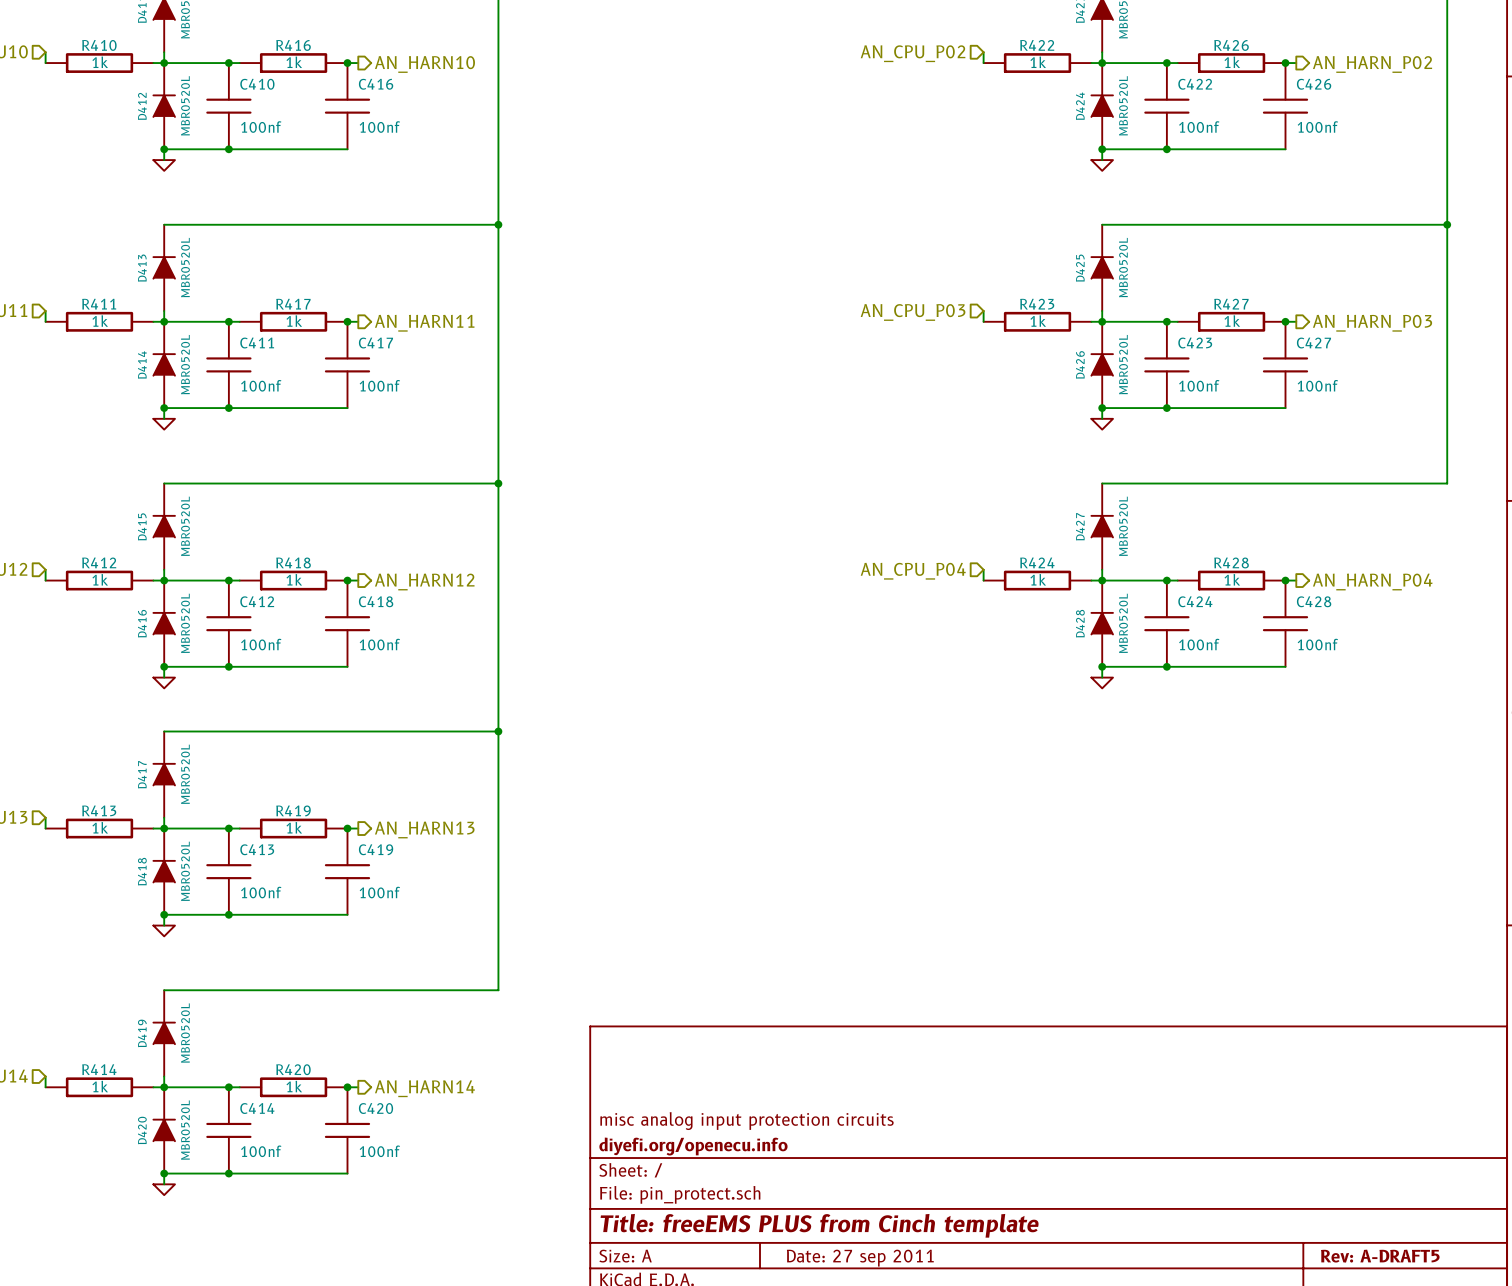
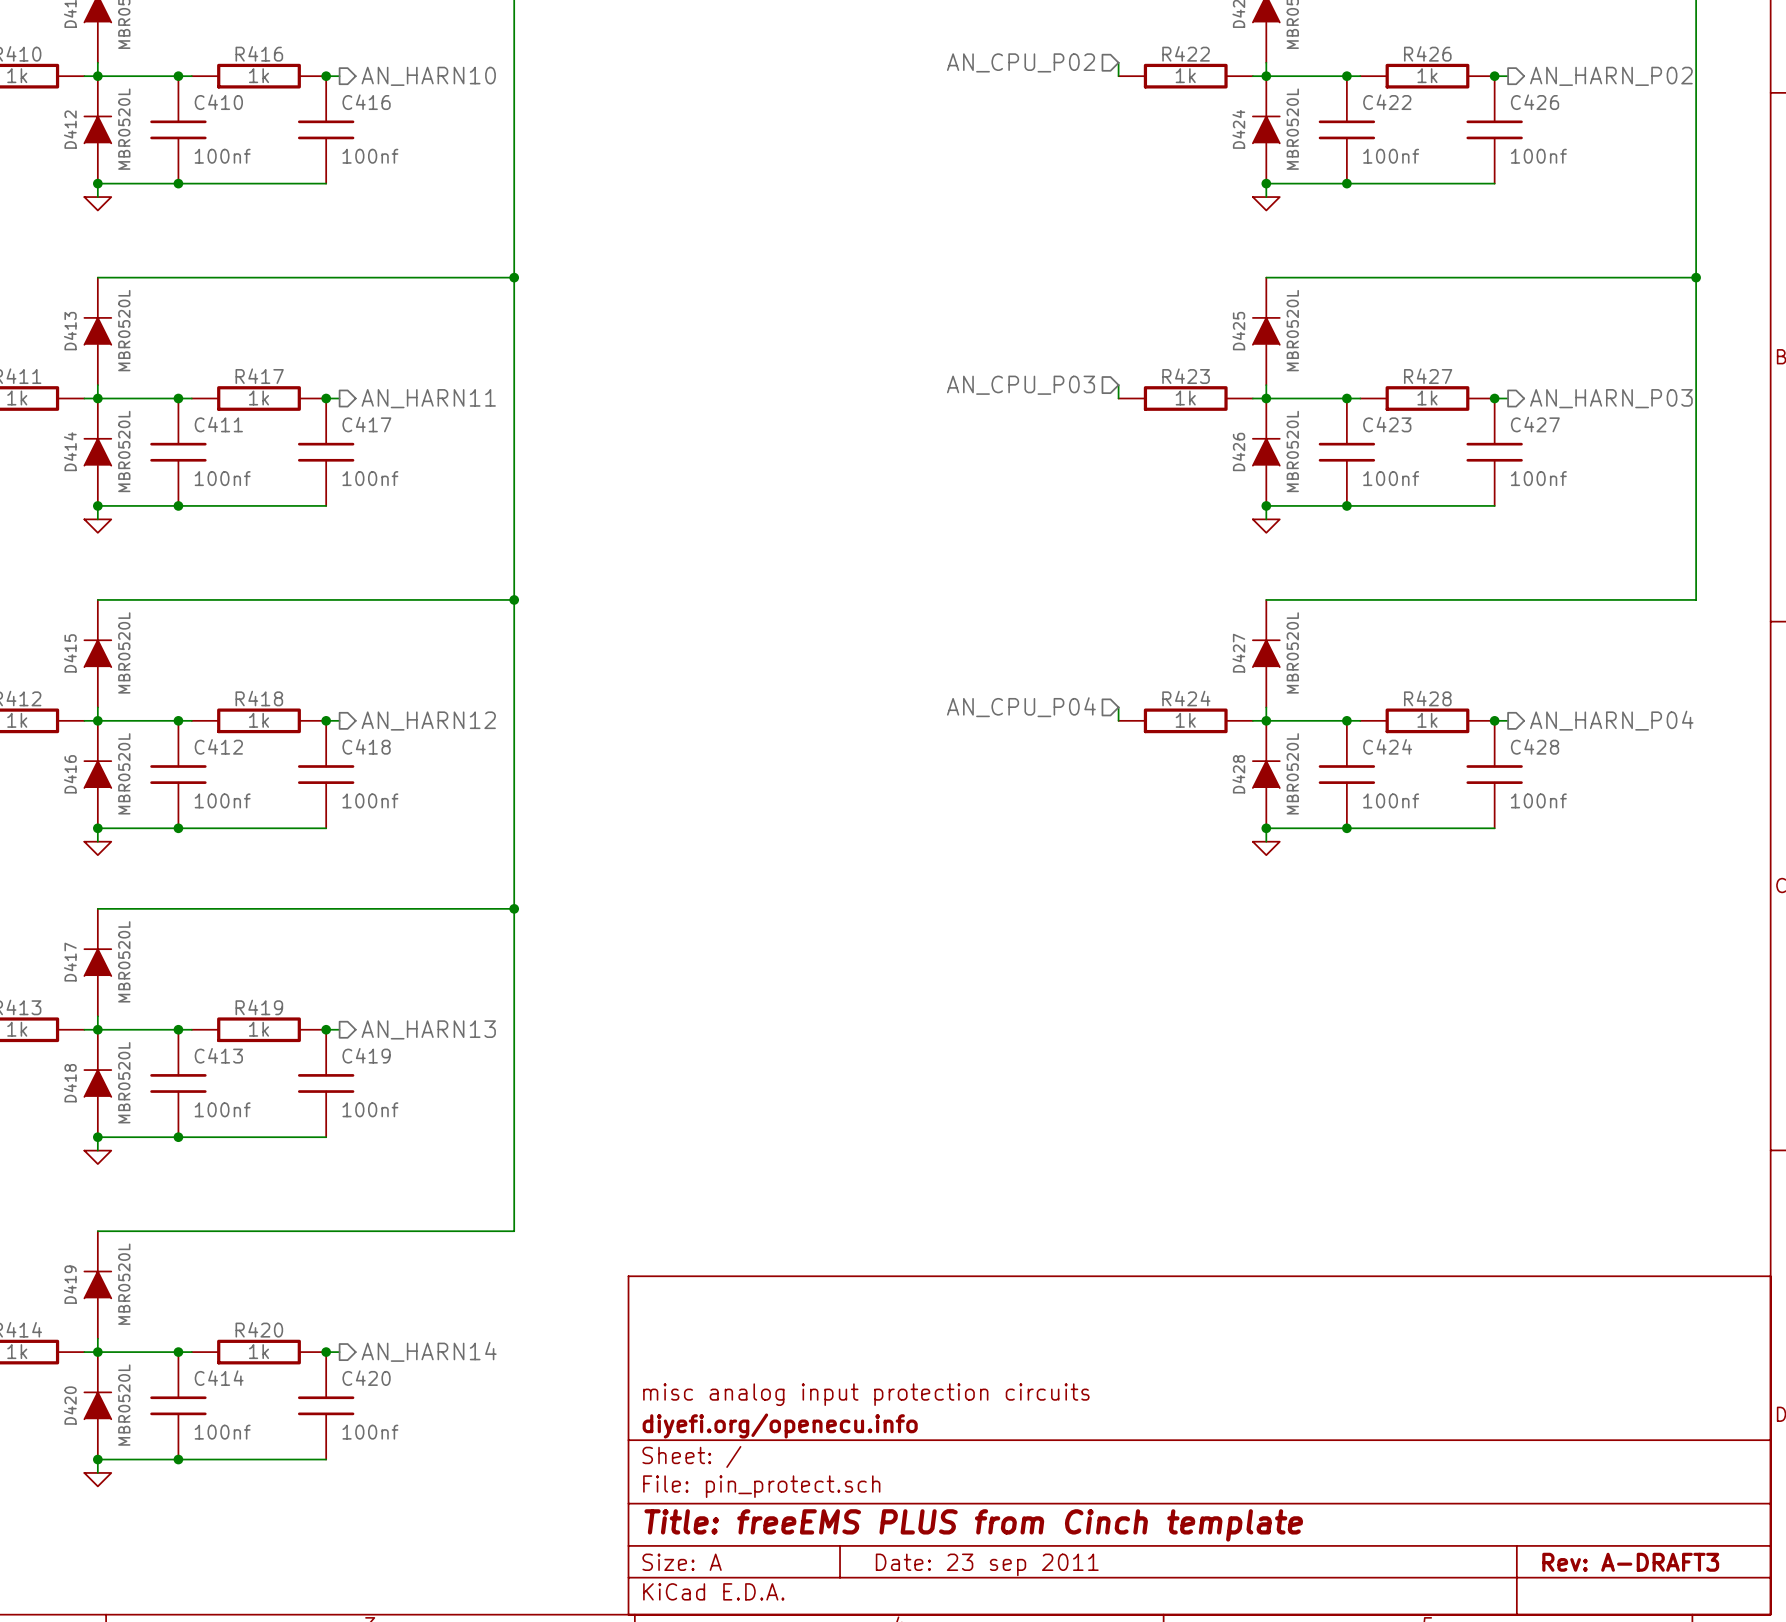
title block: Rev: A-DRAFT5 (1380, 1256) -> Rev: A-DRAFT3 (1630, 1562)
title block: Date: 27 sep 2011 (860, 1258) -> Date: 23 sep 2011 (987, 1564)

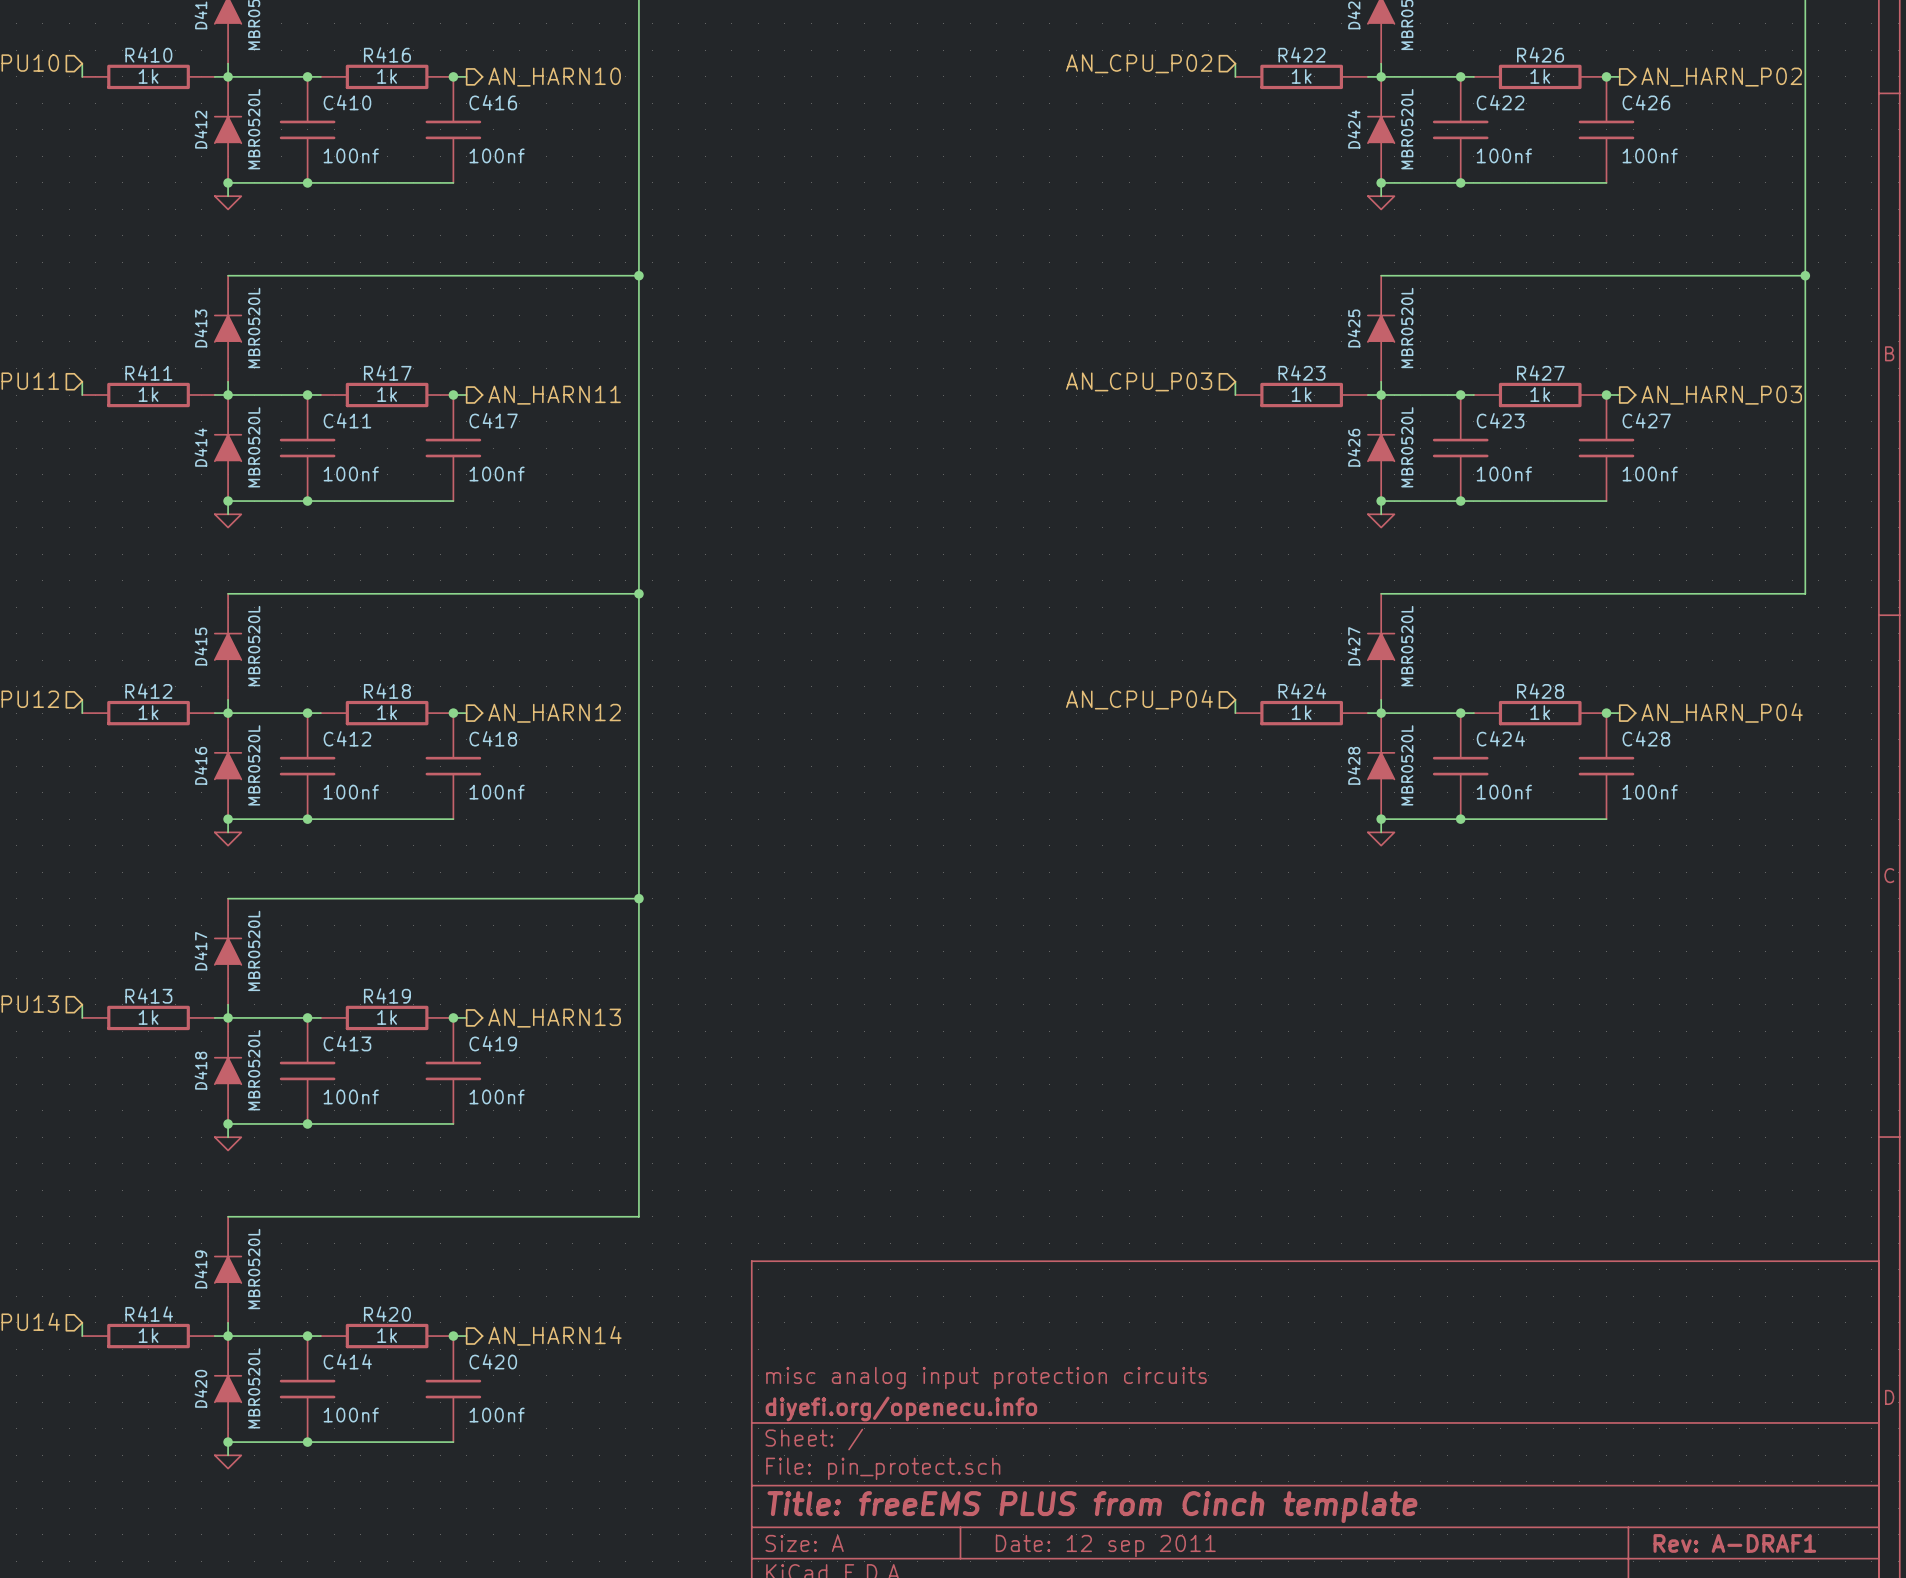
title block: Rev: A-DRAFT3 (1630, 1562) -> Rev: A-DRAF1 (1734, 1543)
title block: Date: 23 sep 2011 (987, 1564) -> Date: 12 sep 2011 (1105, 1546)

